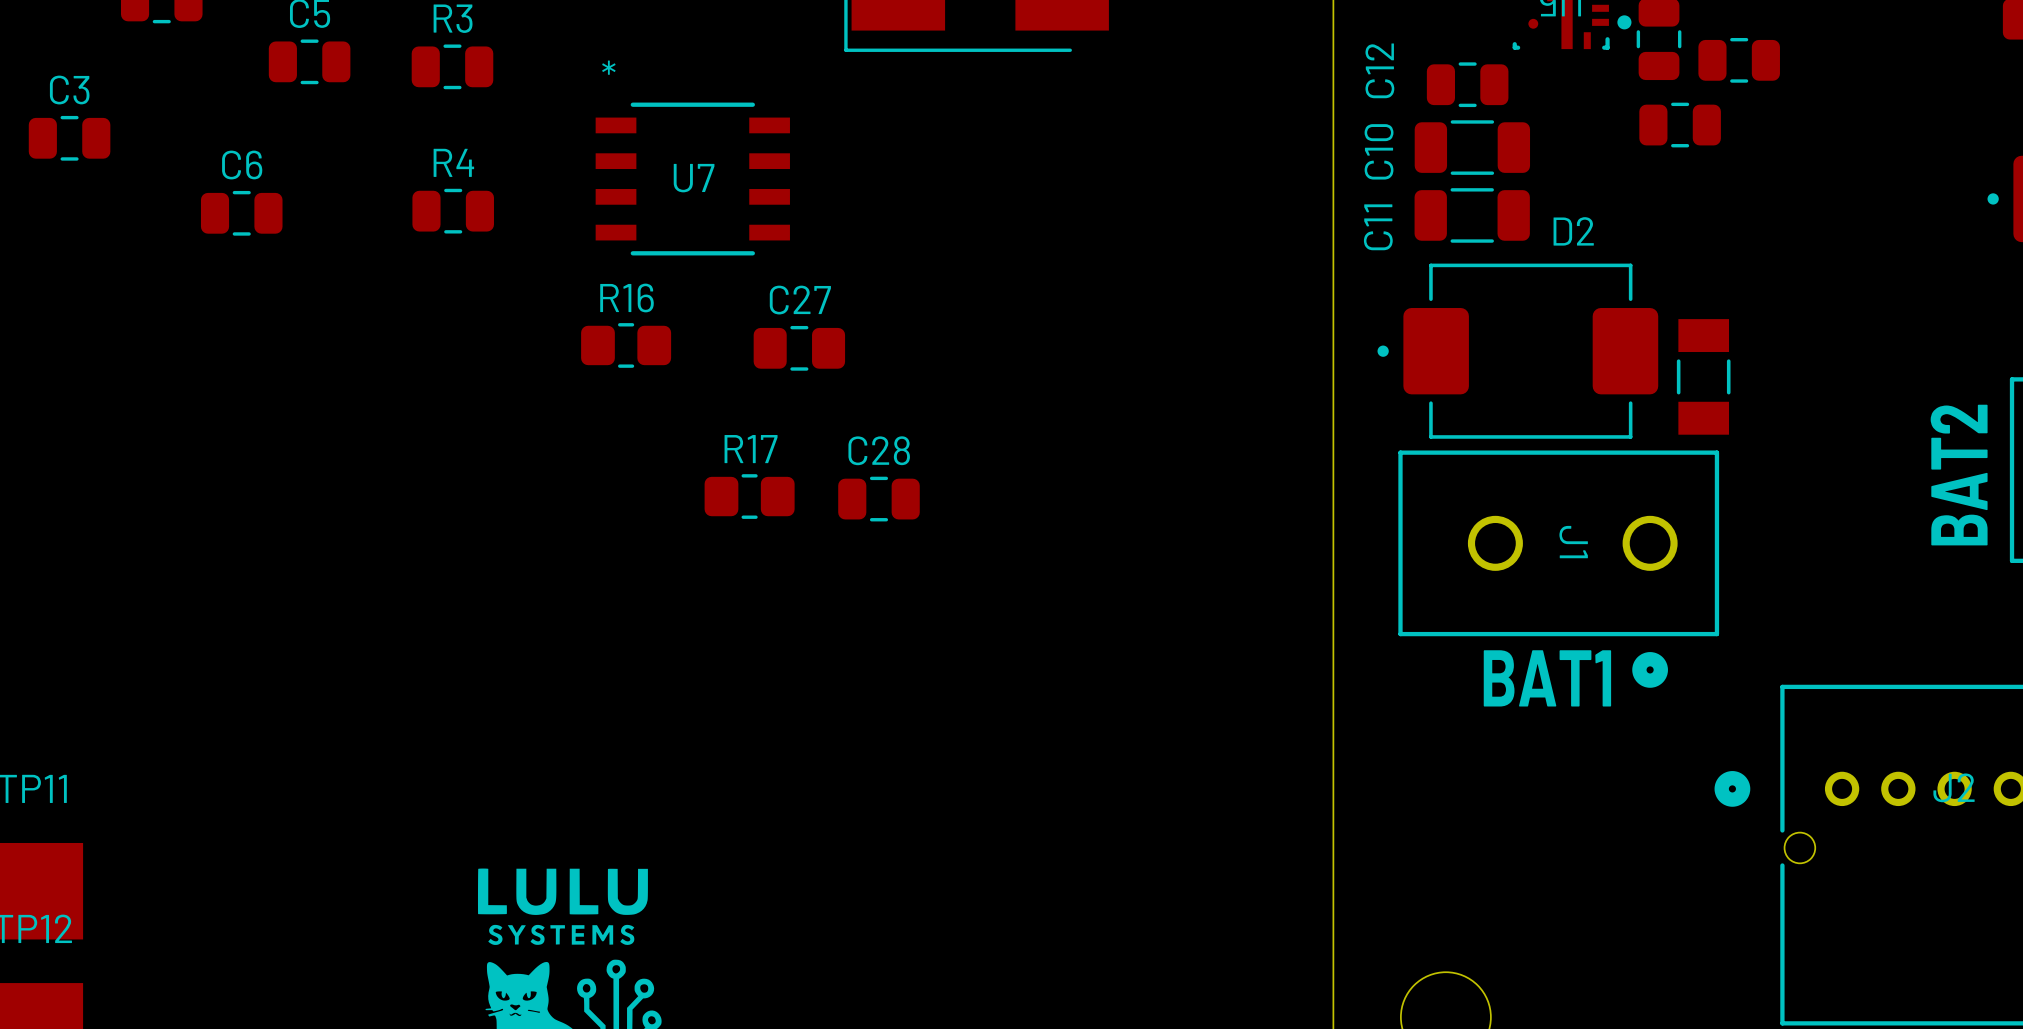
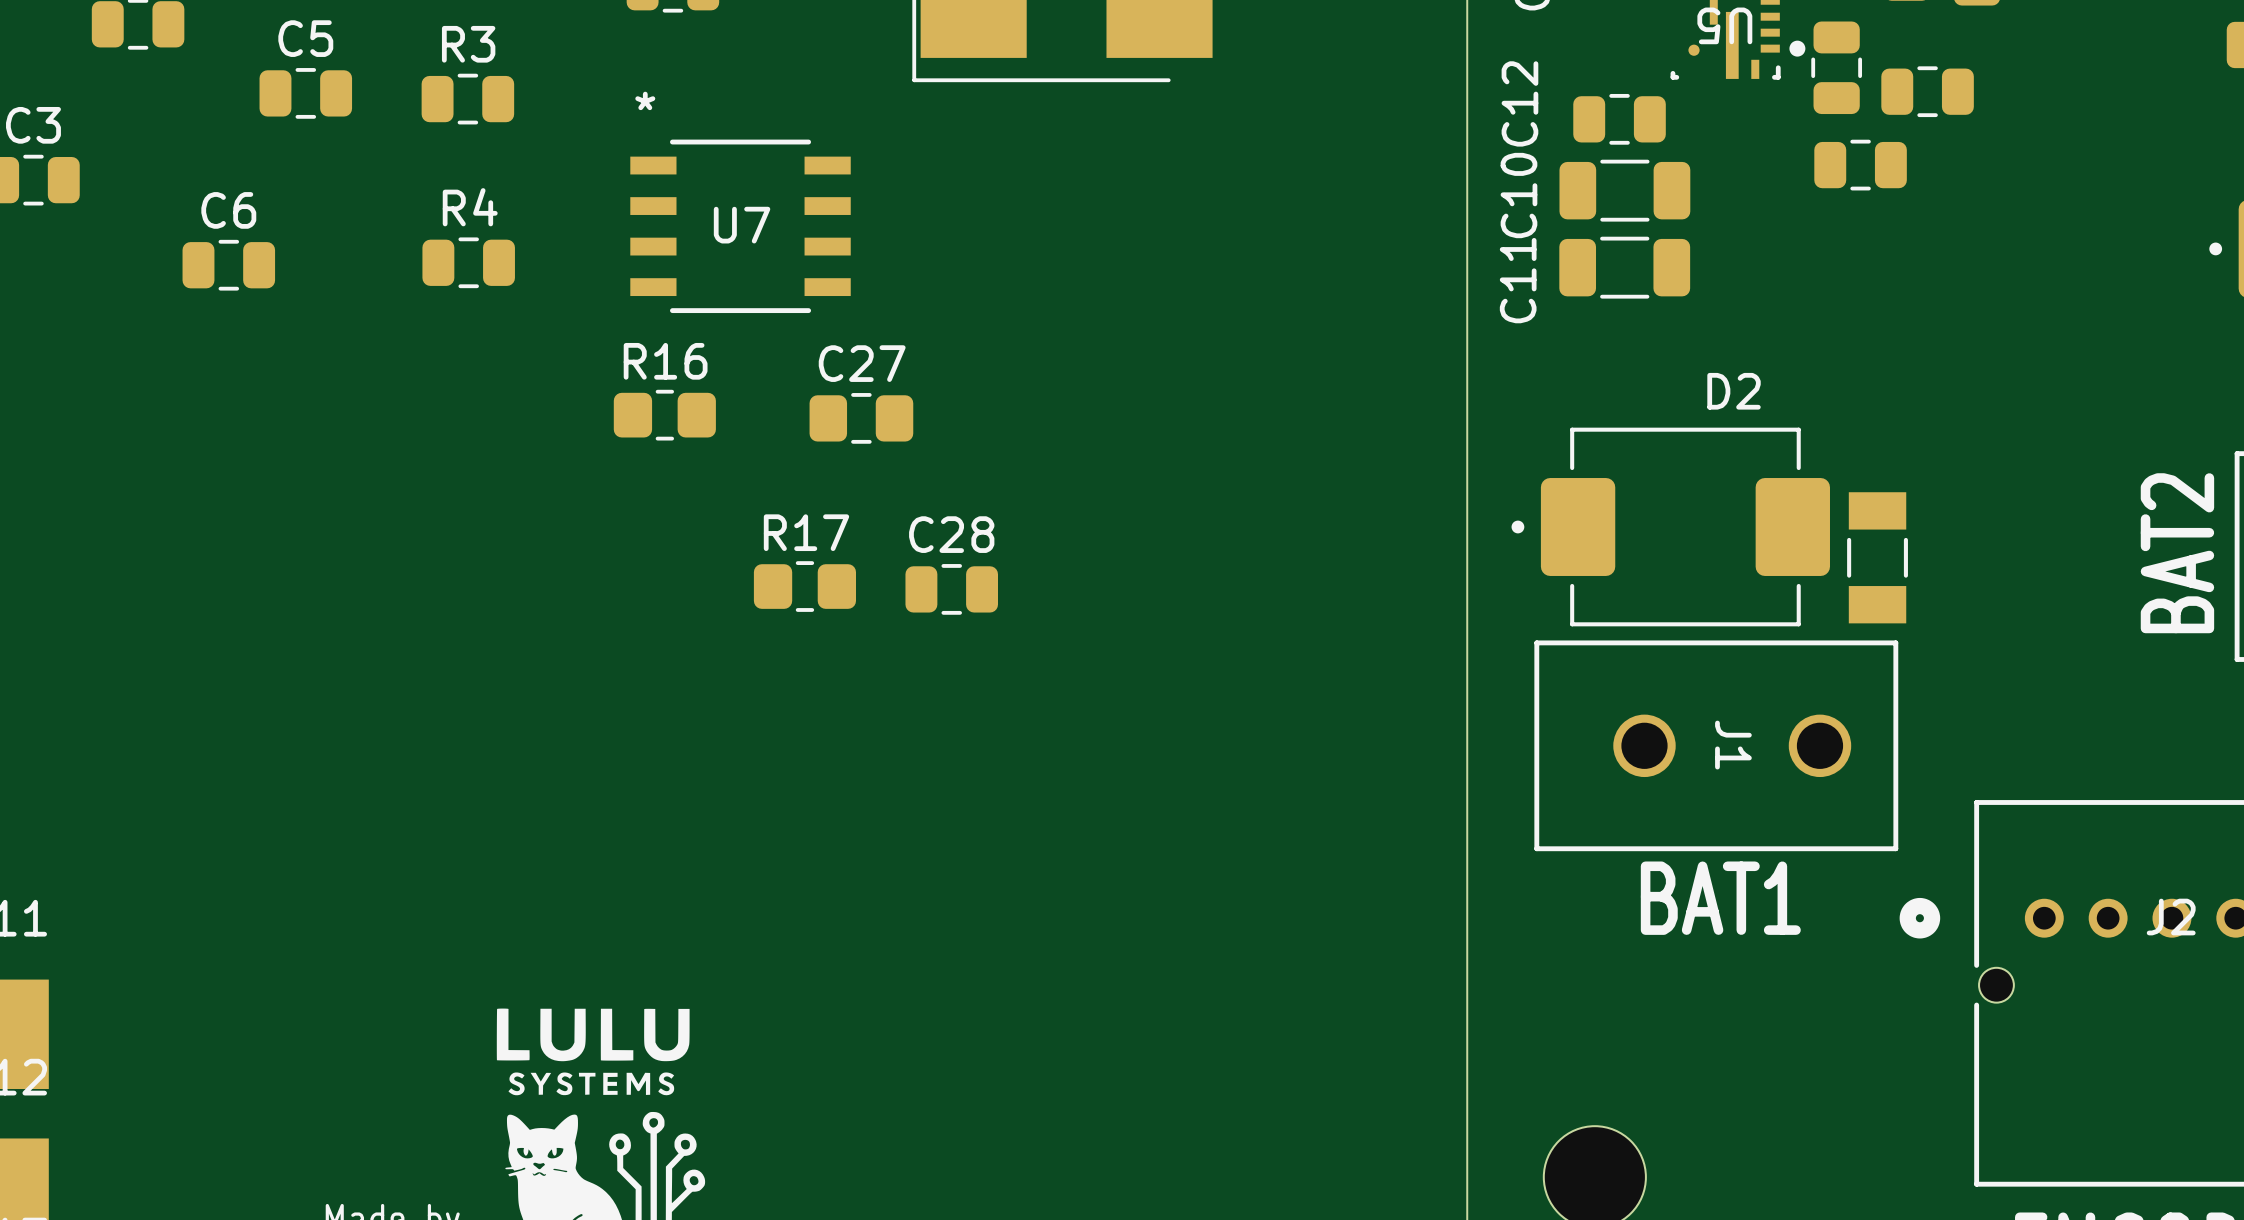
D2 position: (1517, 351) -> (1670, 527)
part position: (1703, 376) -> (1877, 557)
J1 footprint: [1398, 450, 1720, 688] -> [1534, 640, 1899, 852]
text position: BAT1 (1547, 678) -> BAT1 (1720, 898)

